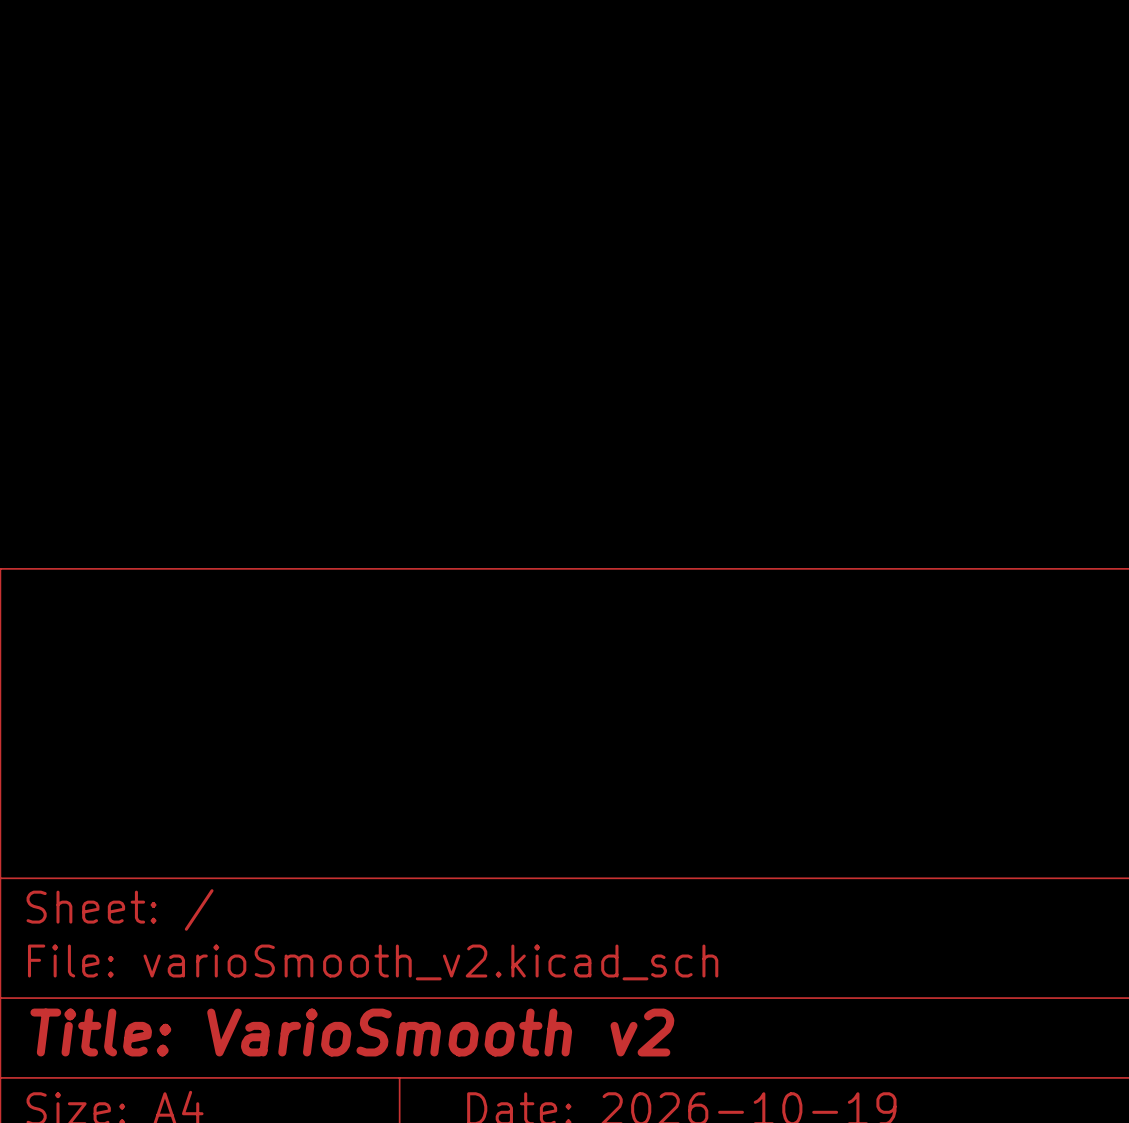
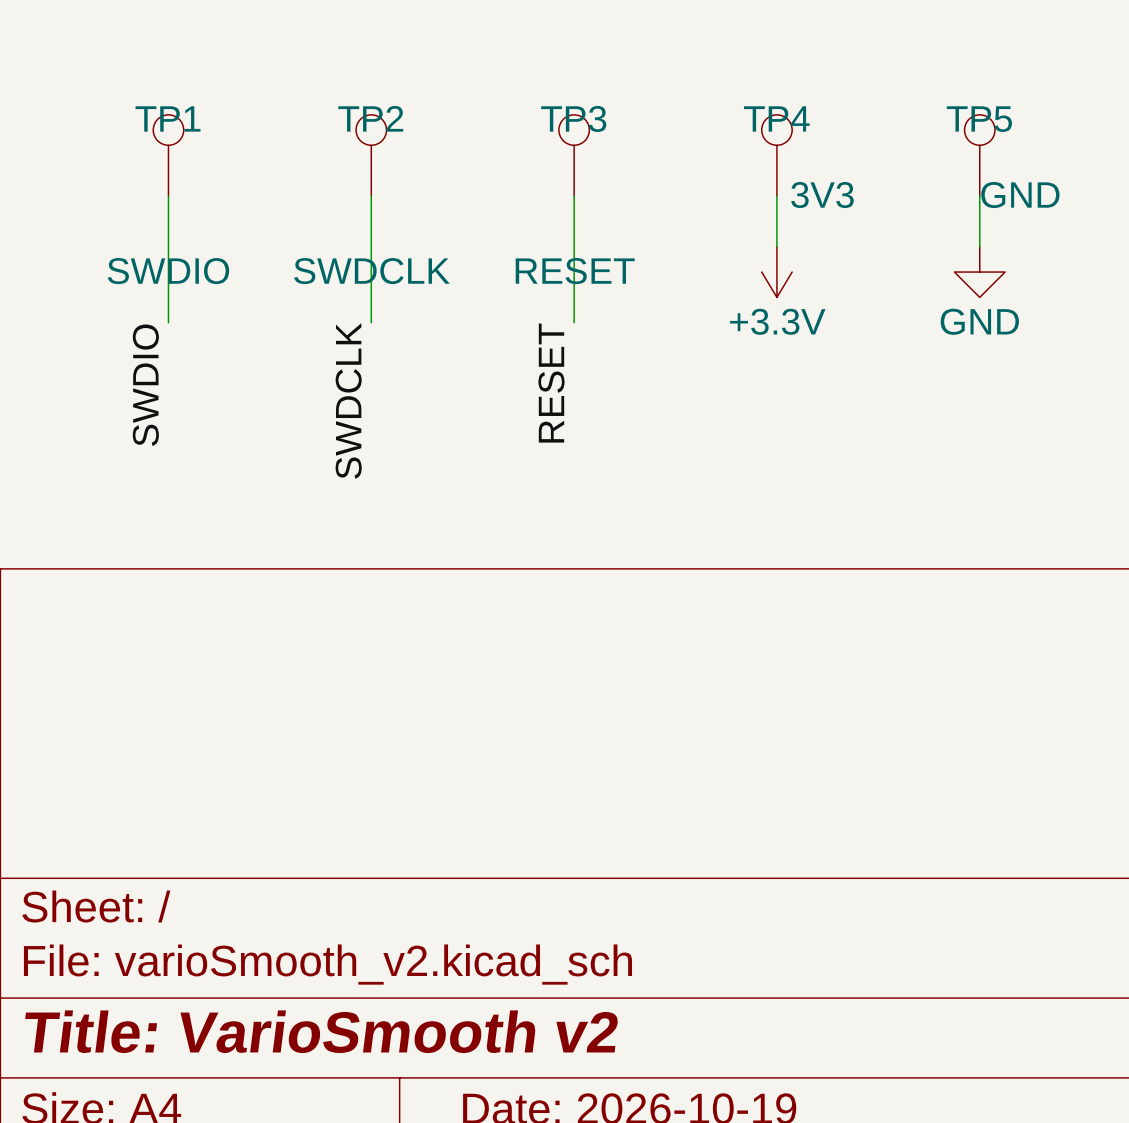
TP1: none -> SWDIO (168, 155)
TP2: none -> SWDCLK (371, 155)
TP3: none -> RESET (574, 155)
TP4: none -> 3V3 (776, 155)
TP5: none -> GND (979, 155)
wire: none -> (168, 195) (168, 322)
wire: none -> (371, 195) (371, 322)
wire: none -> (574, 195) (574, 322)
wire: none -> (776, 195) (776, 246)
wire: none -> (979, 195) (979, 246)
power symbol: none -> +3.3V (776, 272)
power symbol: none -> GND (979, 272)
label: none -> RESET (551, 383)
label: none -> SWDIO (145, 385)
label: none -> SWDCLK (348, 400)

